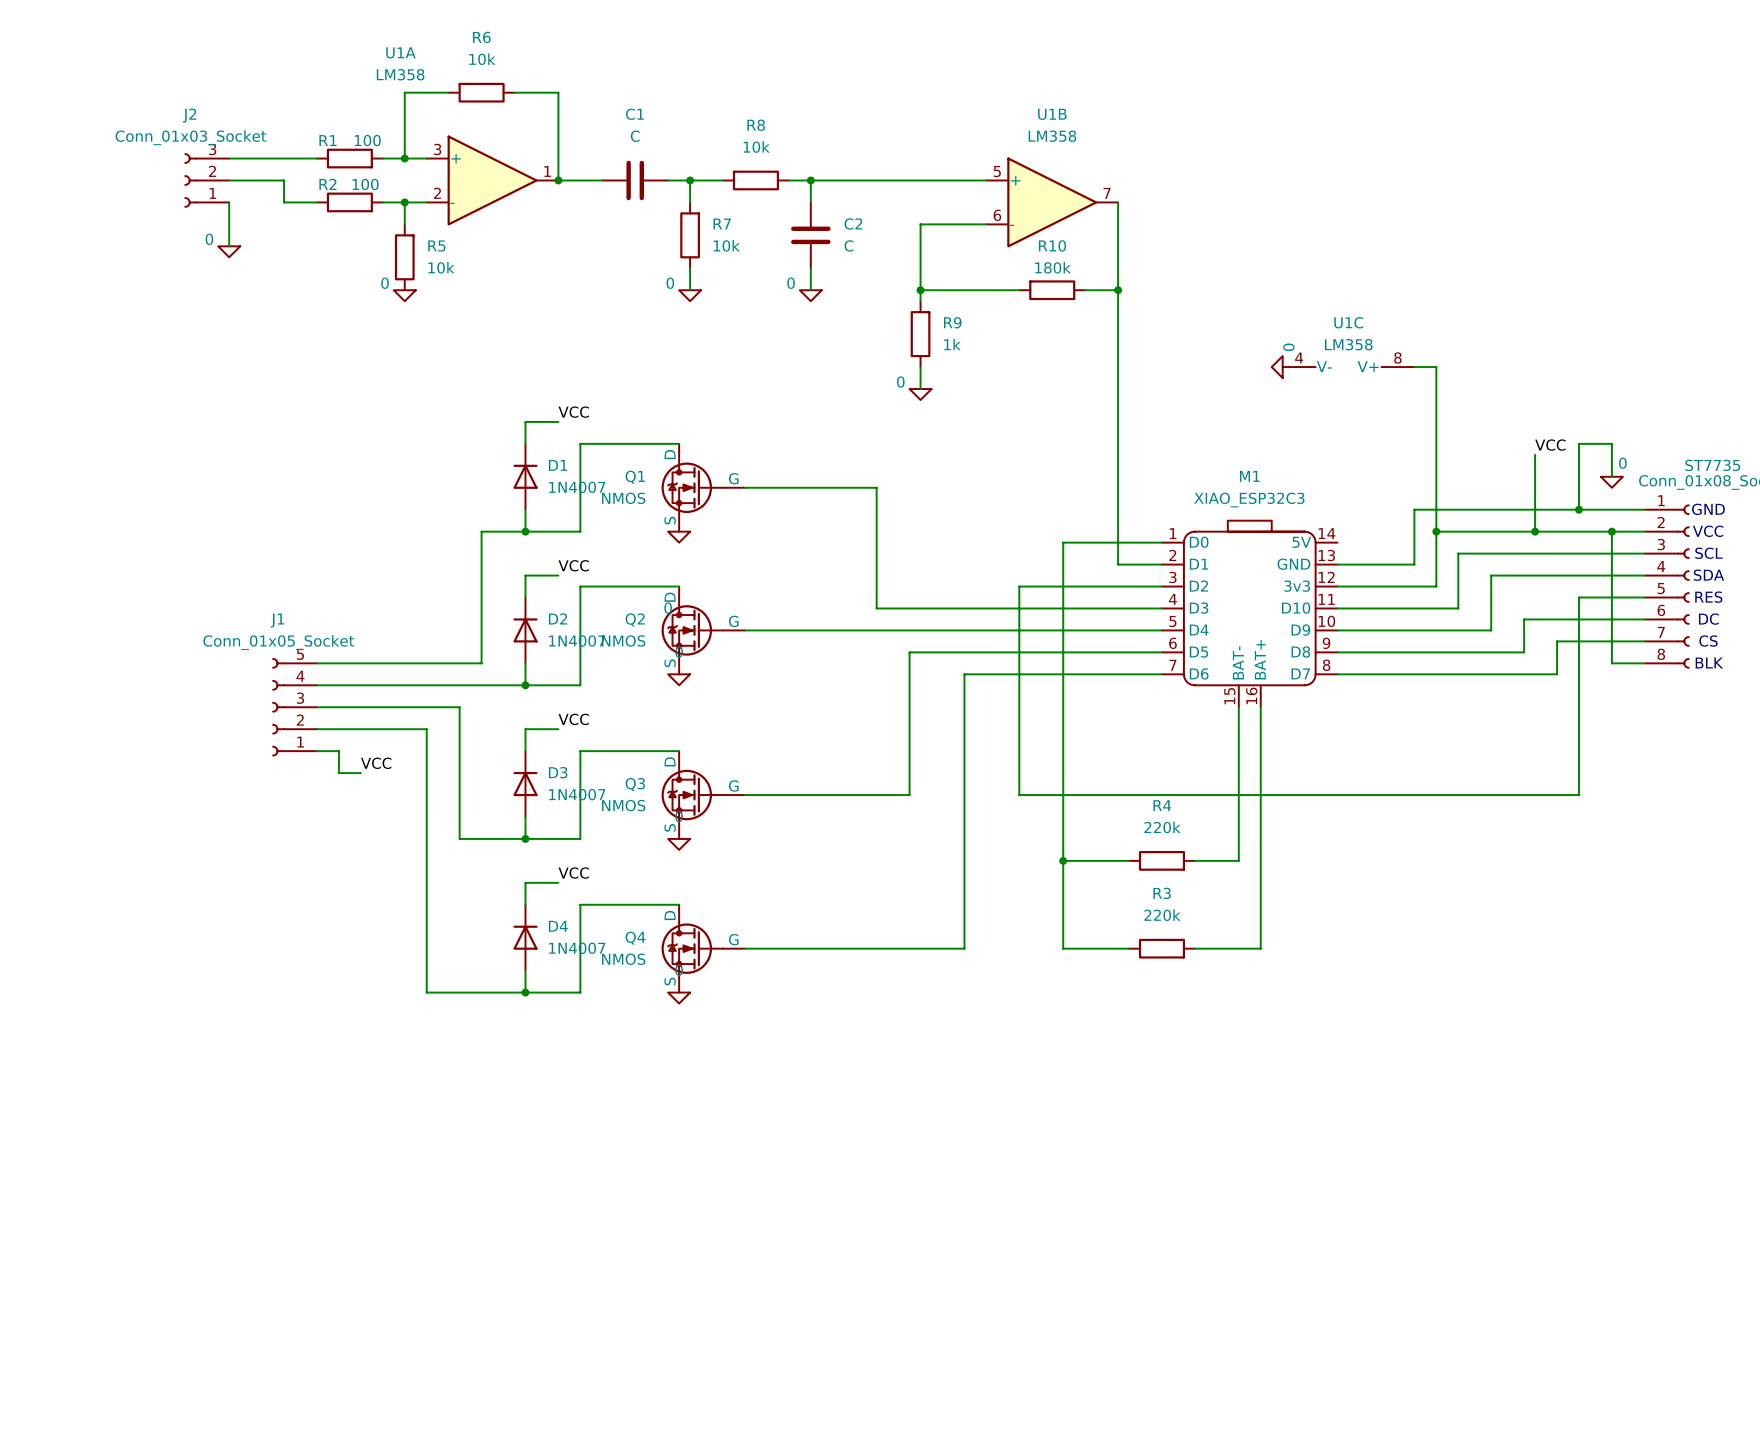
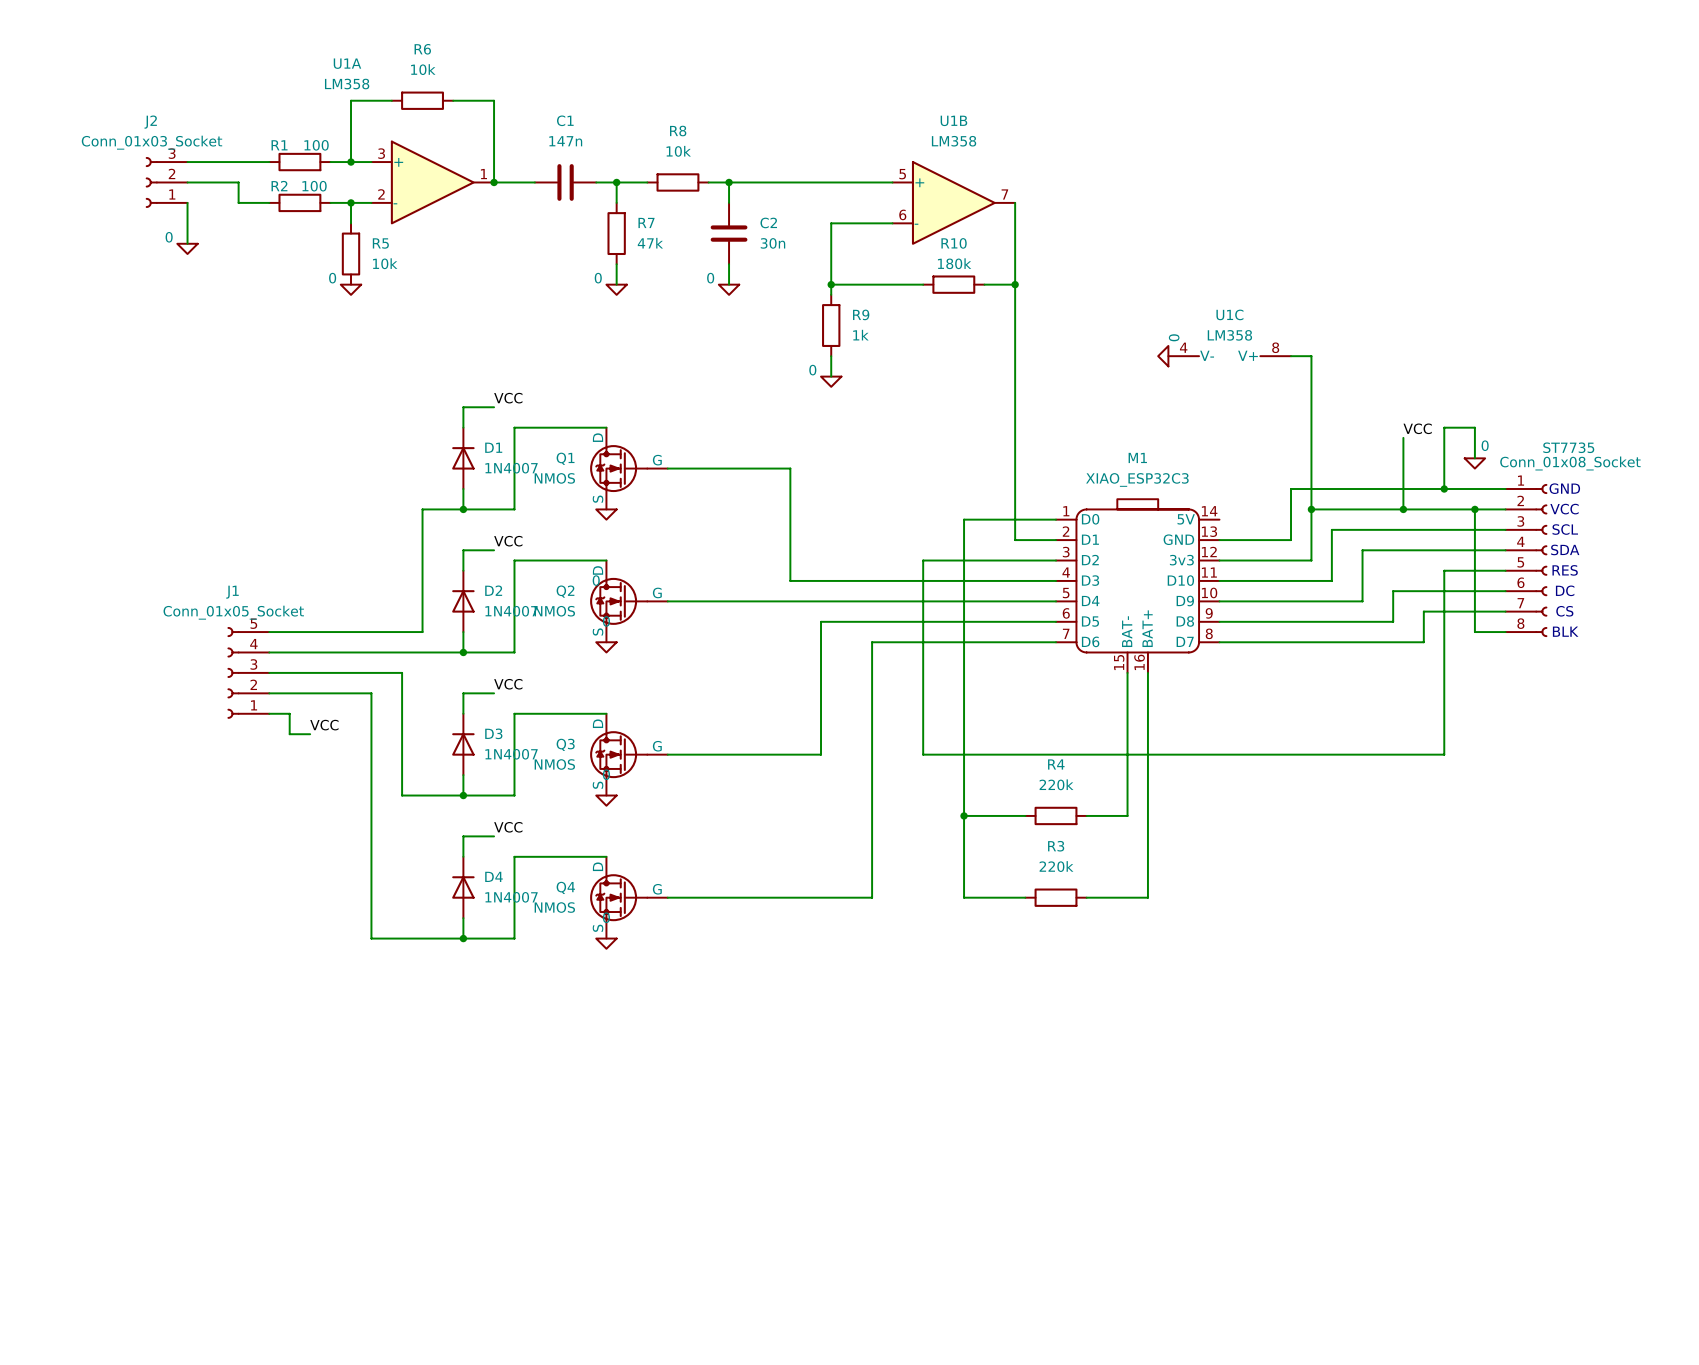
C1 value: C (635, 136) -> 147n (565, 141)
R7 value: 10k (726, 245) -> 47k (650, 243)
C2 value: C (849, 245) -> 30n (773, 243)

